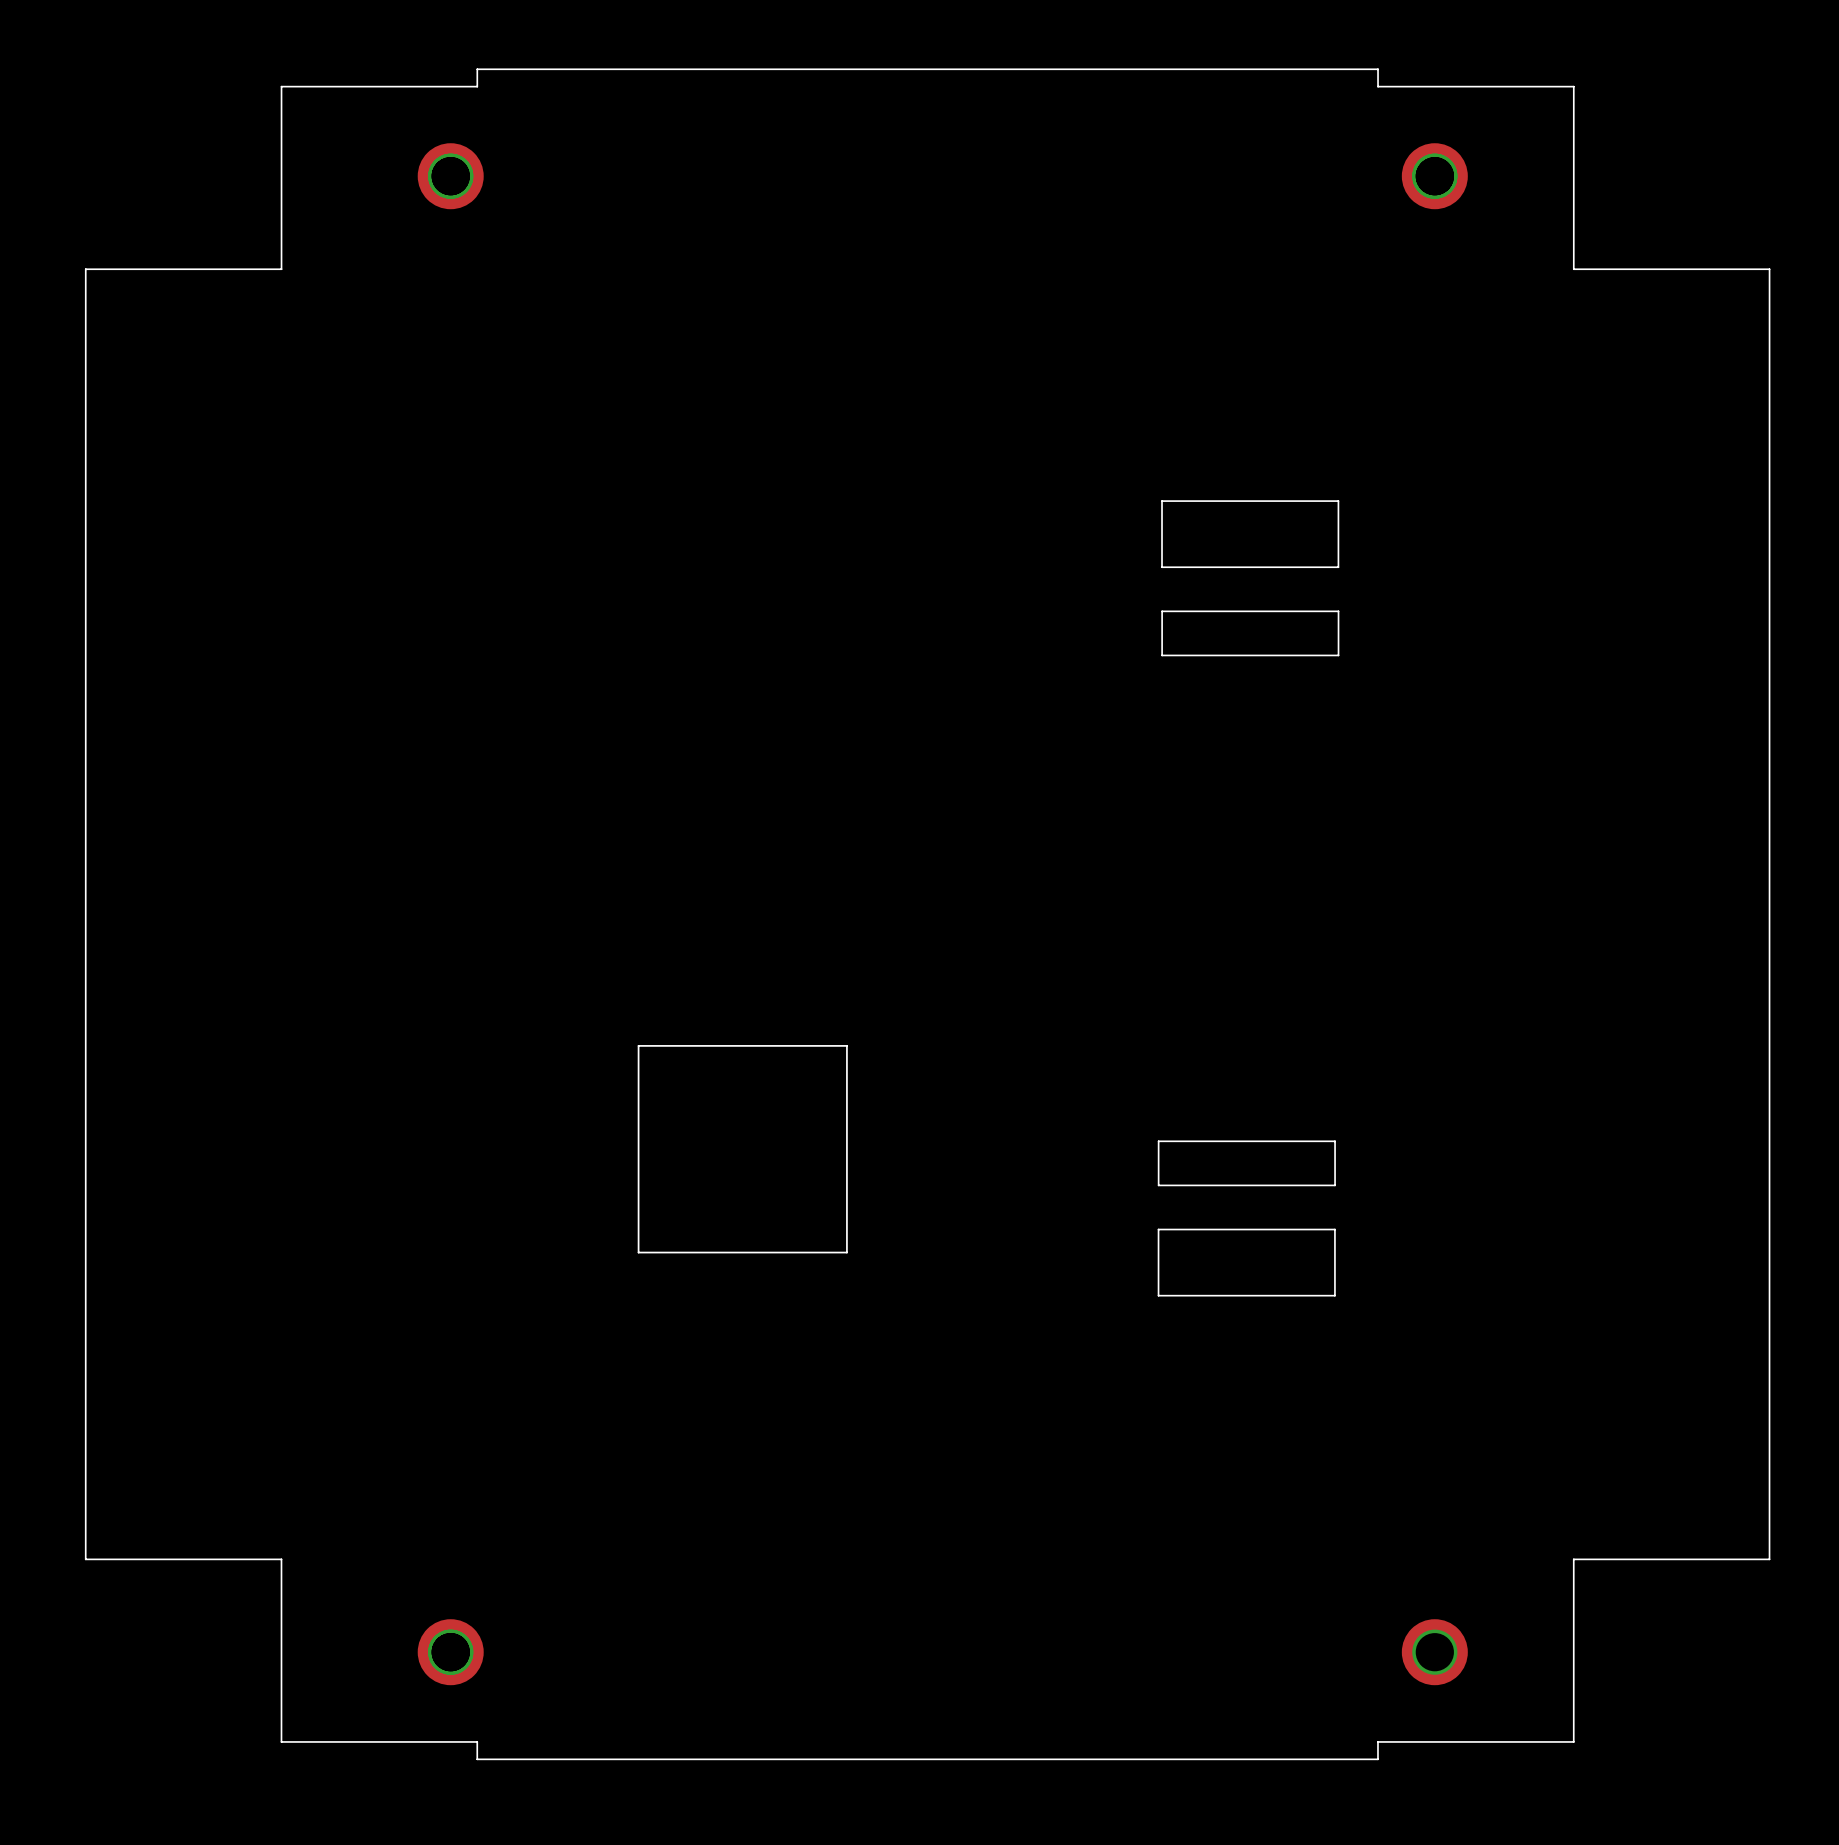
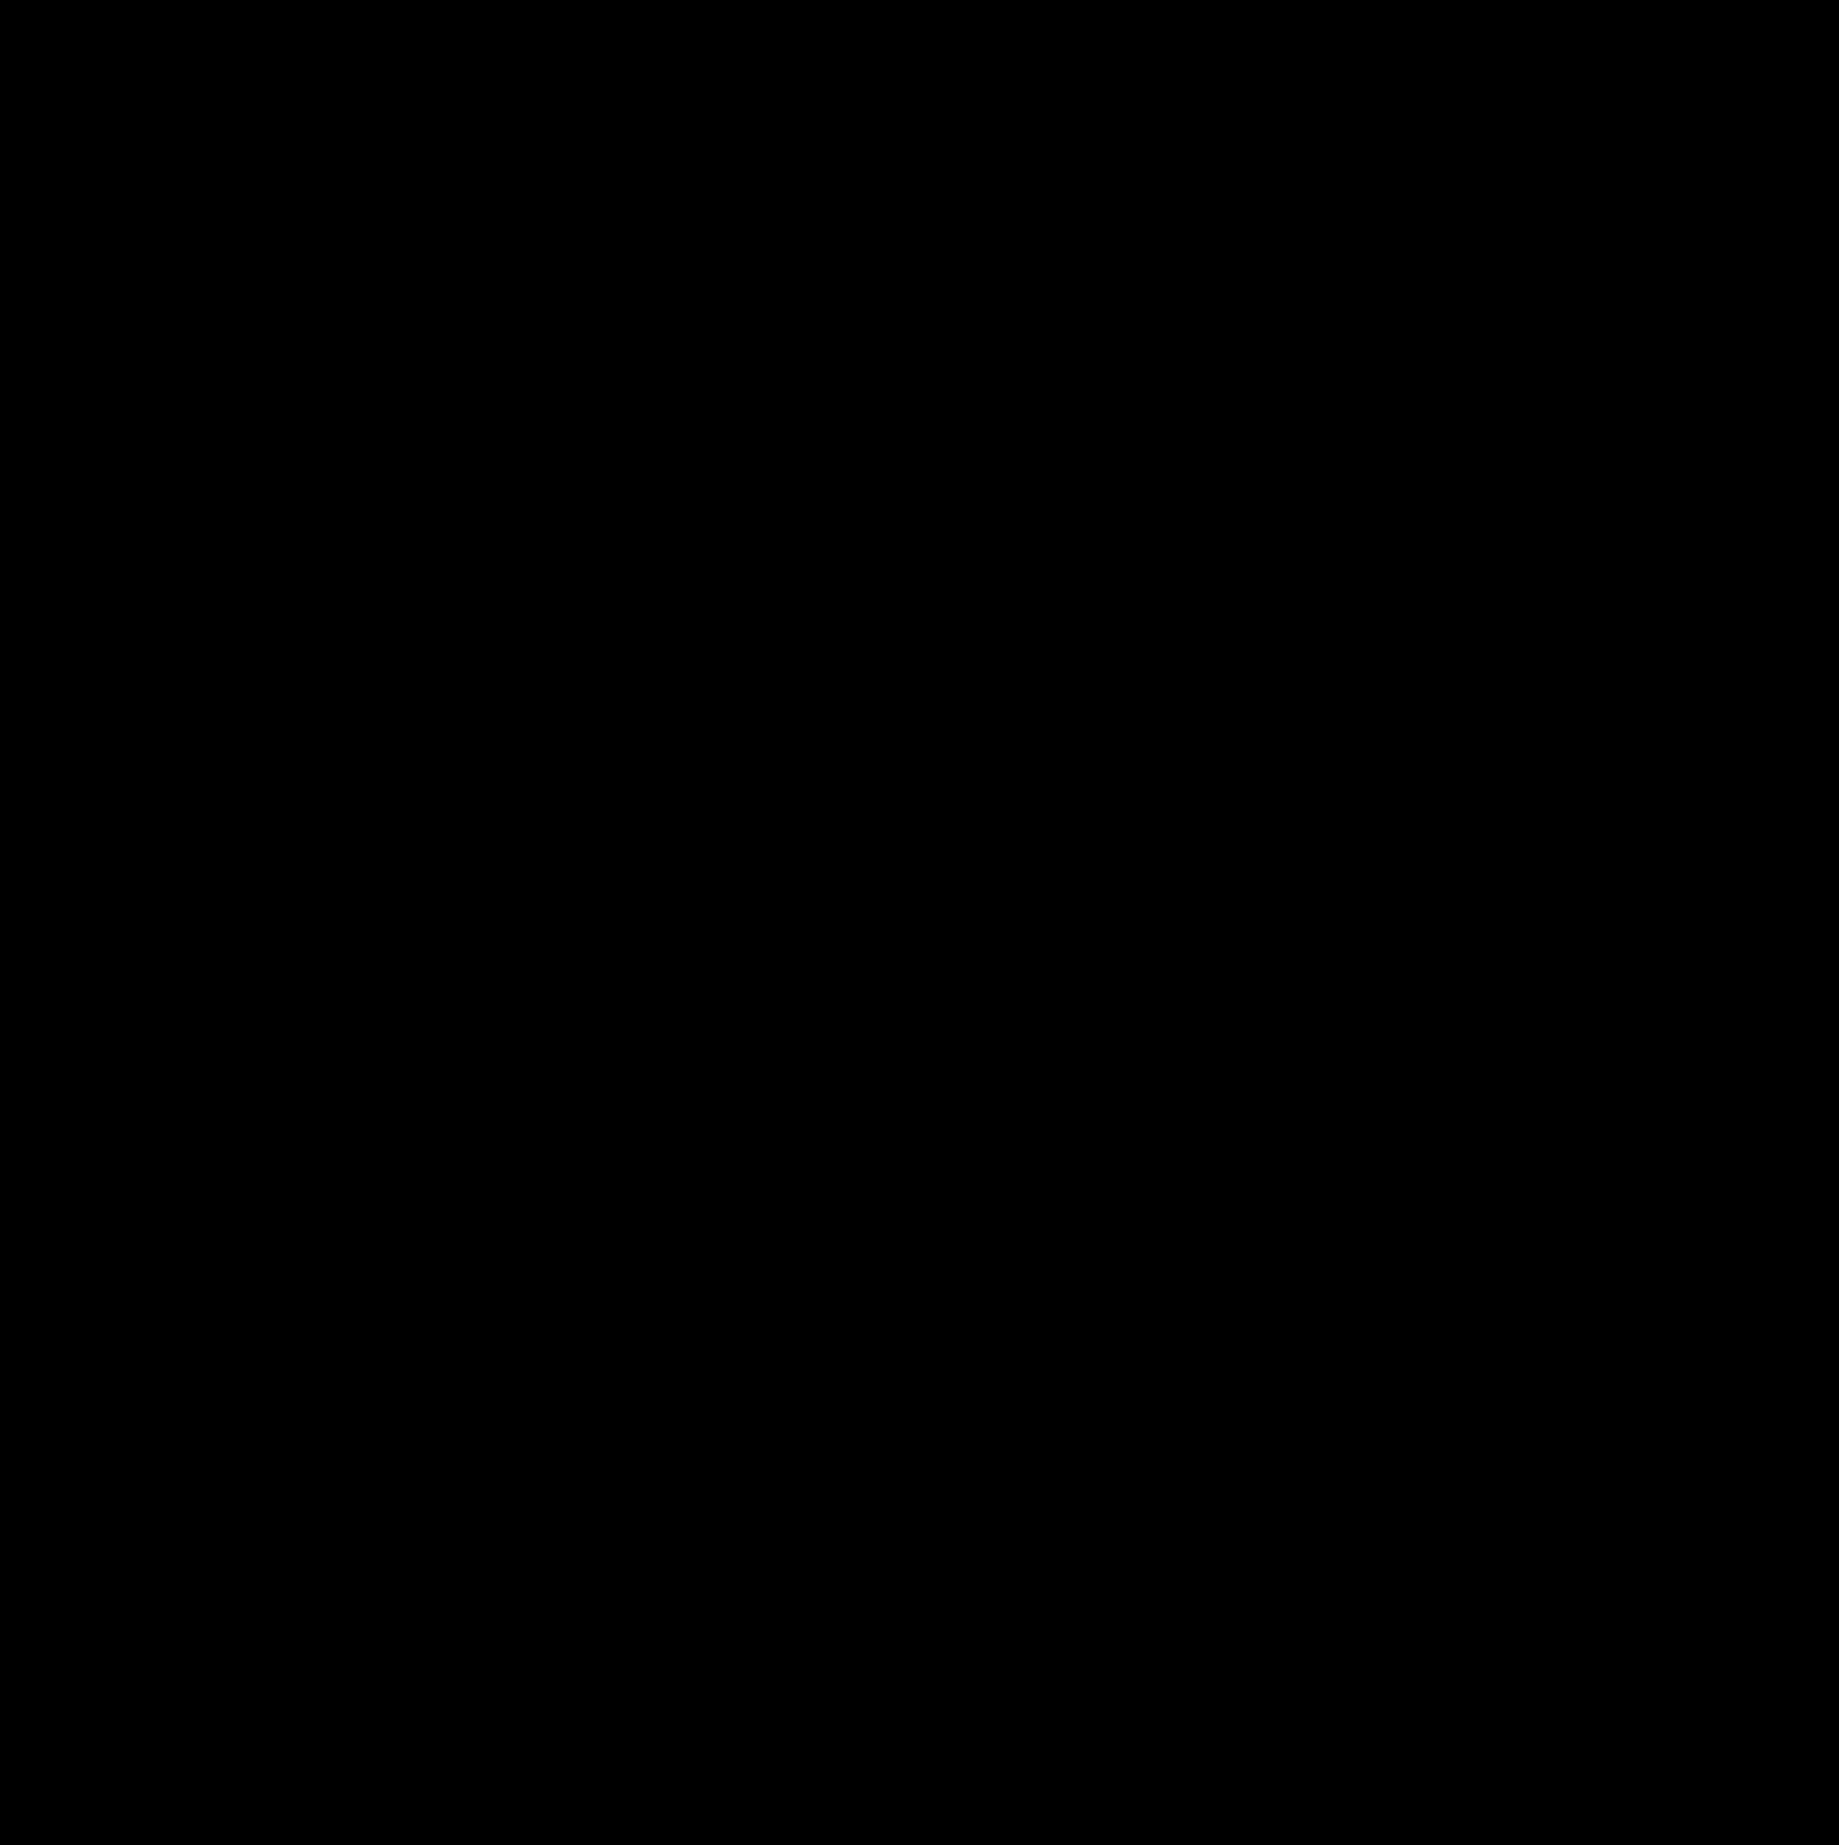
board edge: (477, 69) (477, 86) (281, 86) (281, 269) (85, 269) (85, 1559) (281, 1559) (281, 1741) (477, 1741) (477, 1759) (1377, 1759) (1377, 1741) (1573, 1741) (1573, 1559) (1769, 1559) (1769, 269) (1573, 269) (1573, 86) (1378, 86) (1378, 69) (477, 69) -> none
part: (450, 176) -> none
part: (450, 176) -> none
part: (1434, 176) -> none
part: (1434, 176) -> none
board edge: (1162, 501) (1162, 567) (1338, 567) (1338, 501) (1162, 501) -> none
board edge: (1162, 611) (1162, 655) (1338, 655) (1338, 611) (1162, 611) -> none
board edge: (638, 1045) (846, 1045) (846, 1252) (638, 1252) (638, 1045) -> none
board edge: (1158, 1141) (1158, 1185) (1335, 1185) (1335, 1141) (1158, 1141) -> none
board edge: (1158, 1229) (1158, 1295) (1334, 1295) (1334, 1229) (1158, 1229) -> none
part: (450, 1652) -> none
part: (450, 1652) -> none
part: (1434, 1652) -> none

